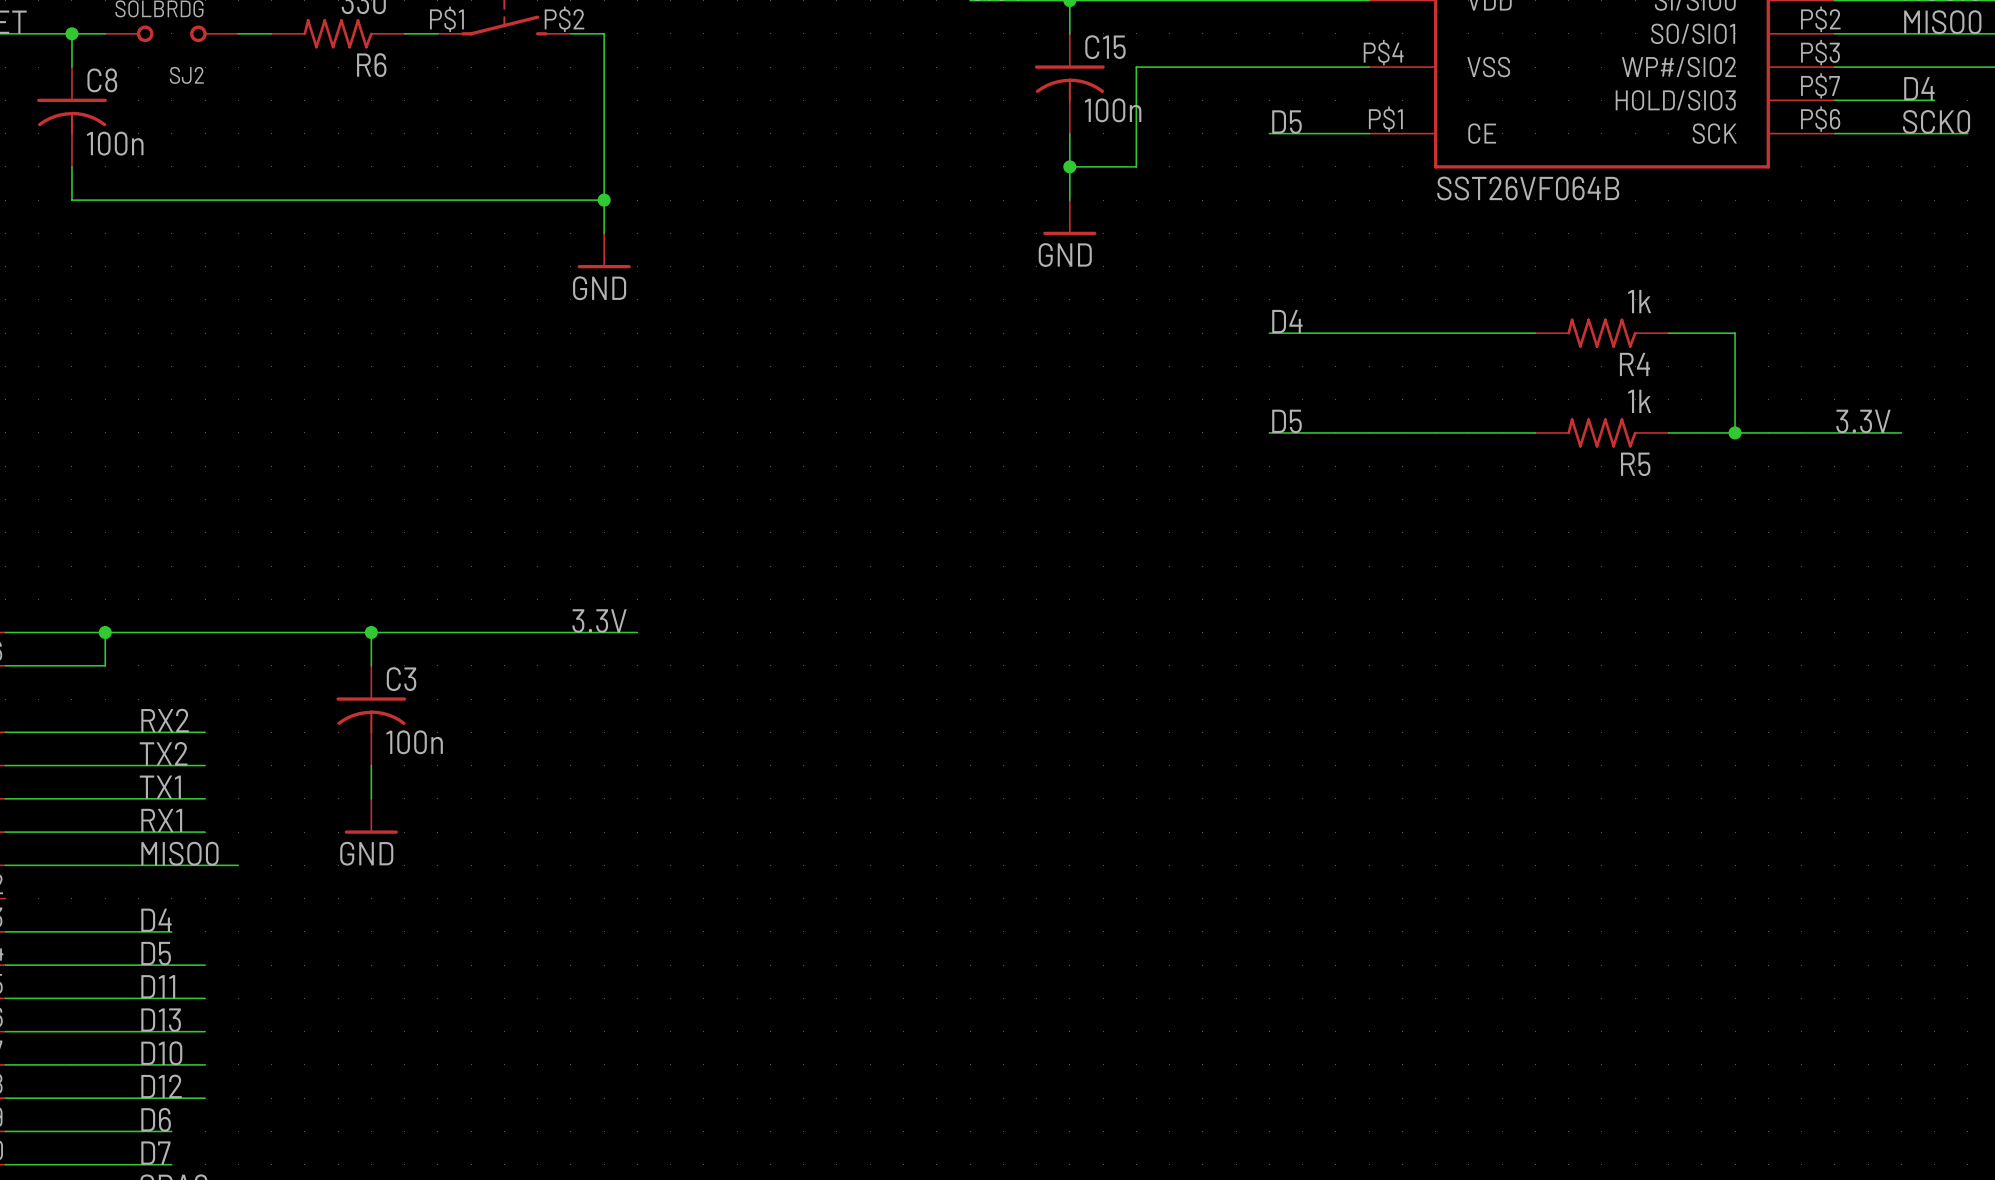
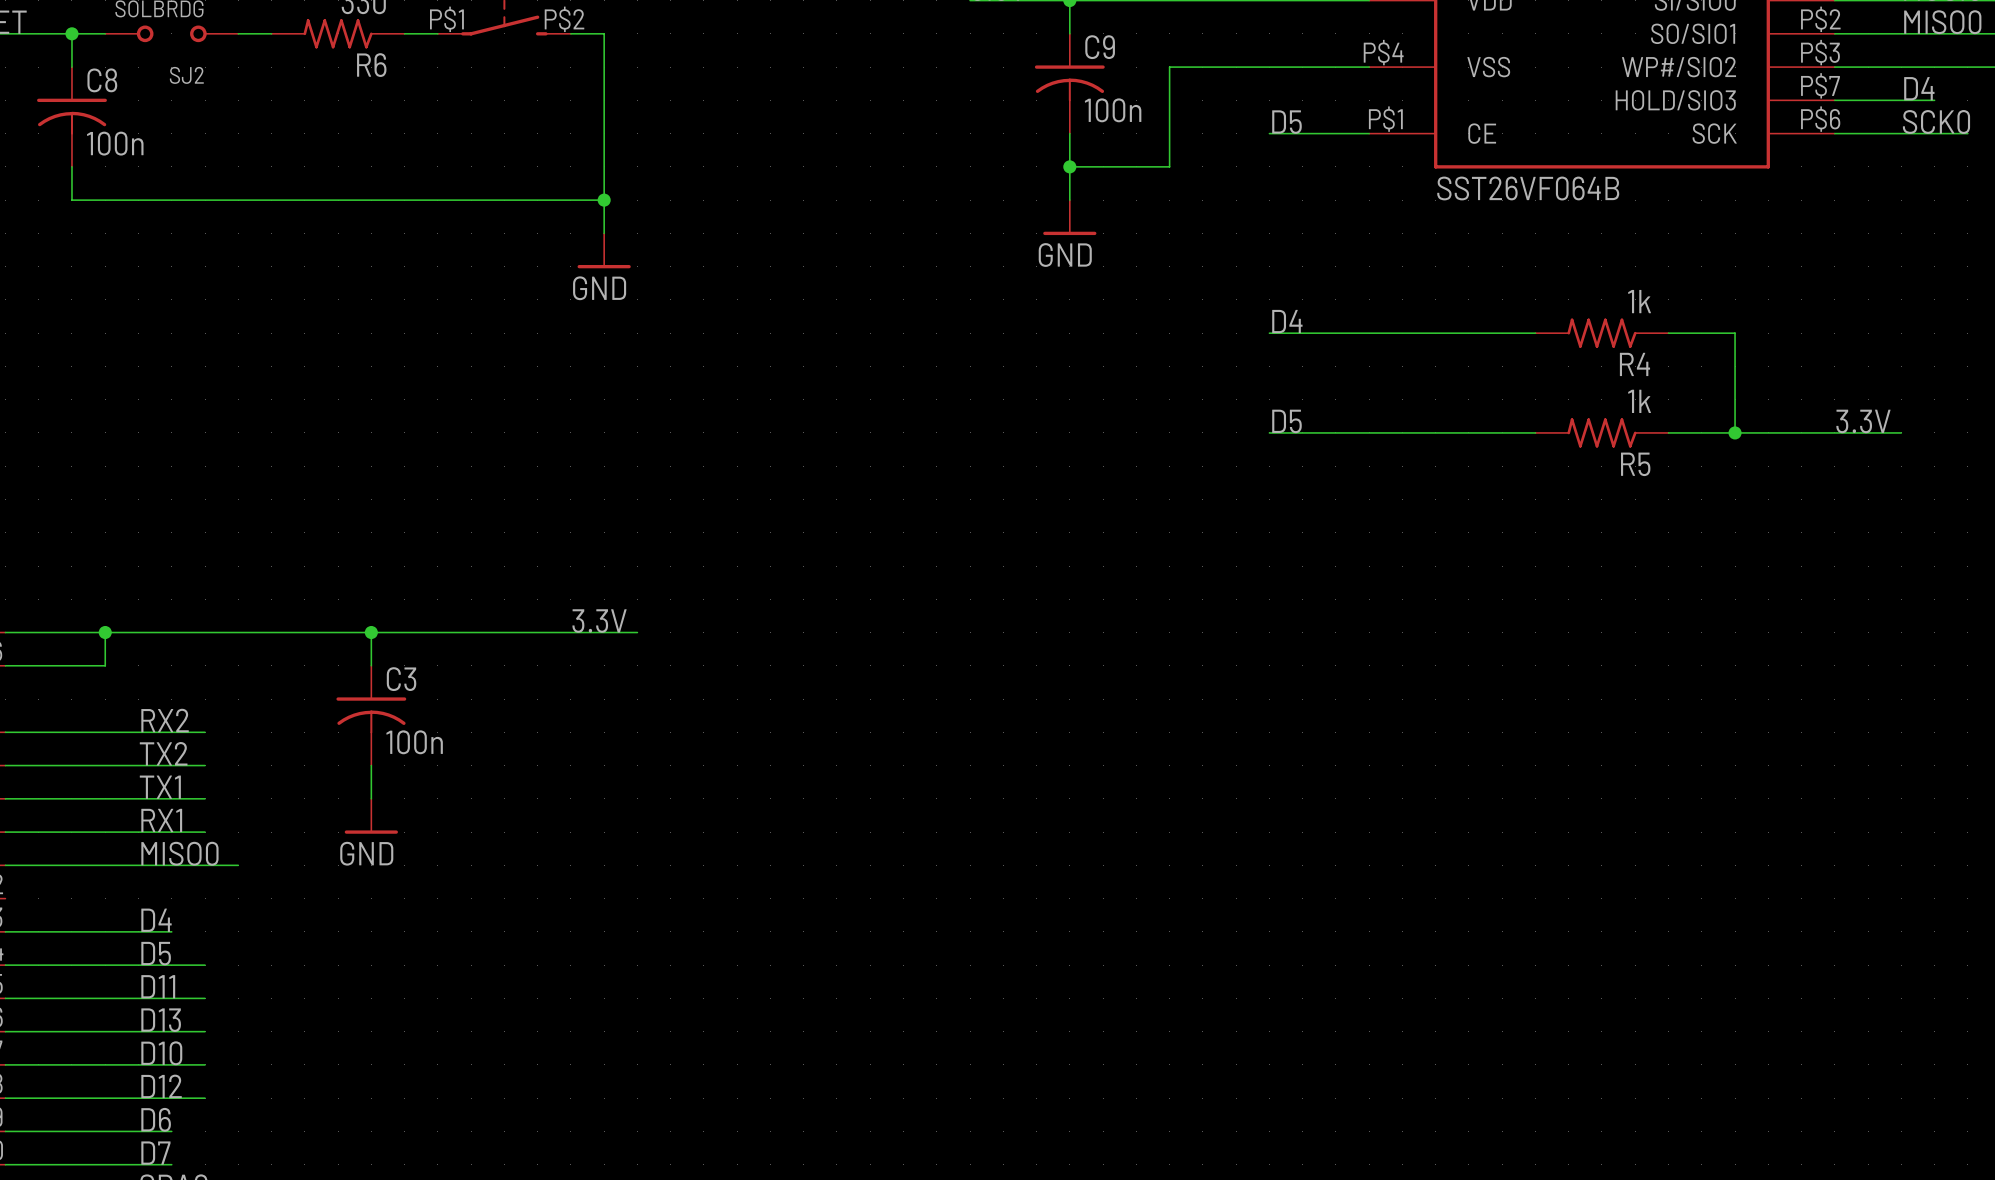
C15 name: C15 (1105, 47) -> C9 (1100, 47)
wire: (1169, 67) (1136, 67) (1136, 166) -> (1169, 67) (1169, 166) (1136, 166)

